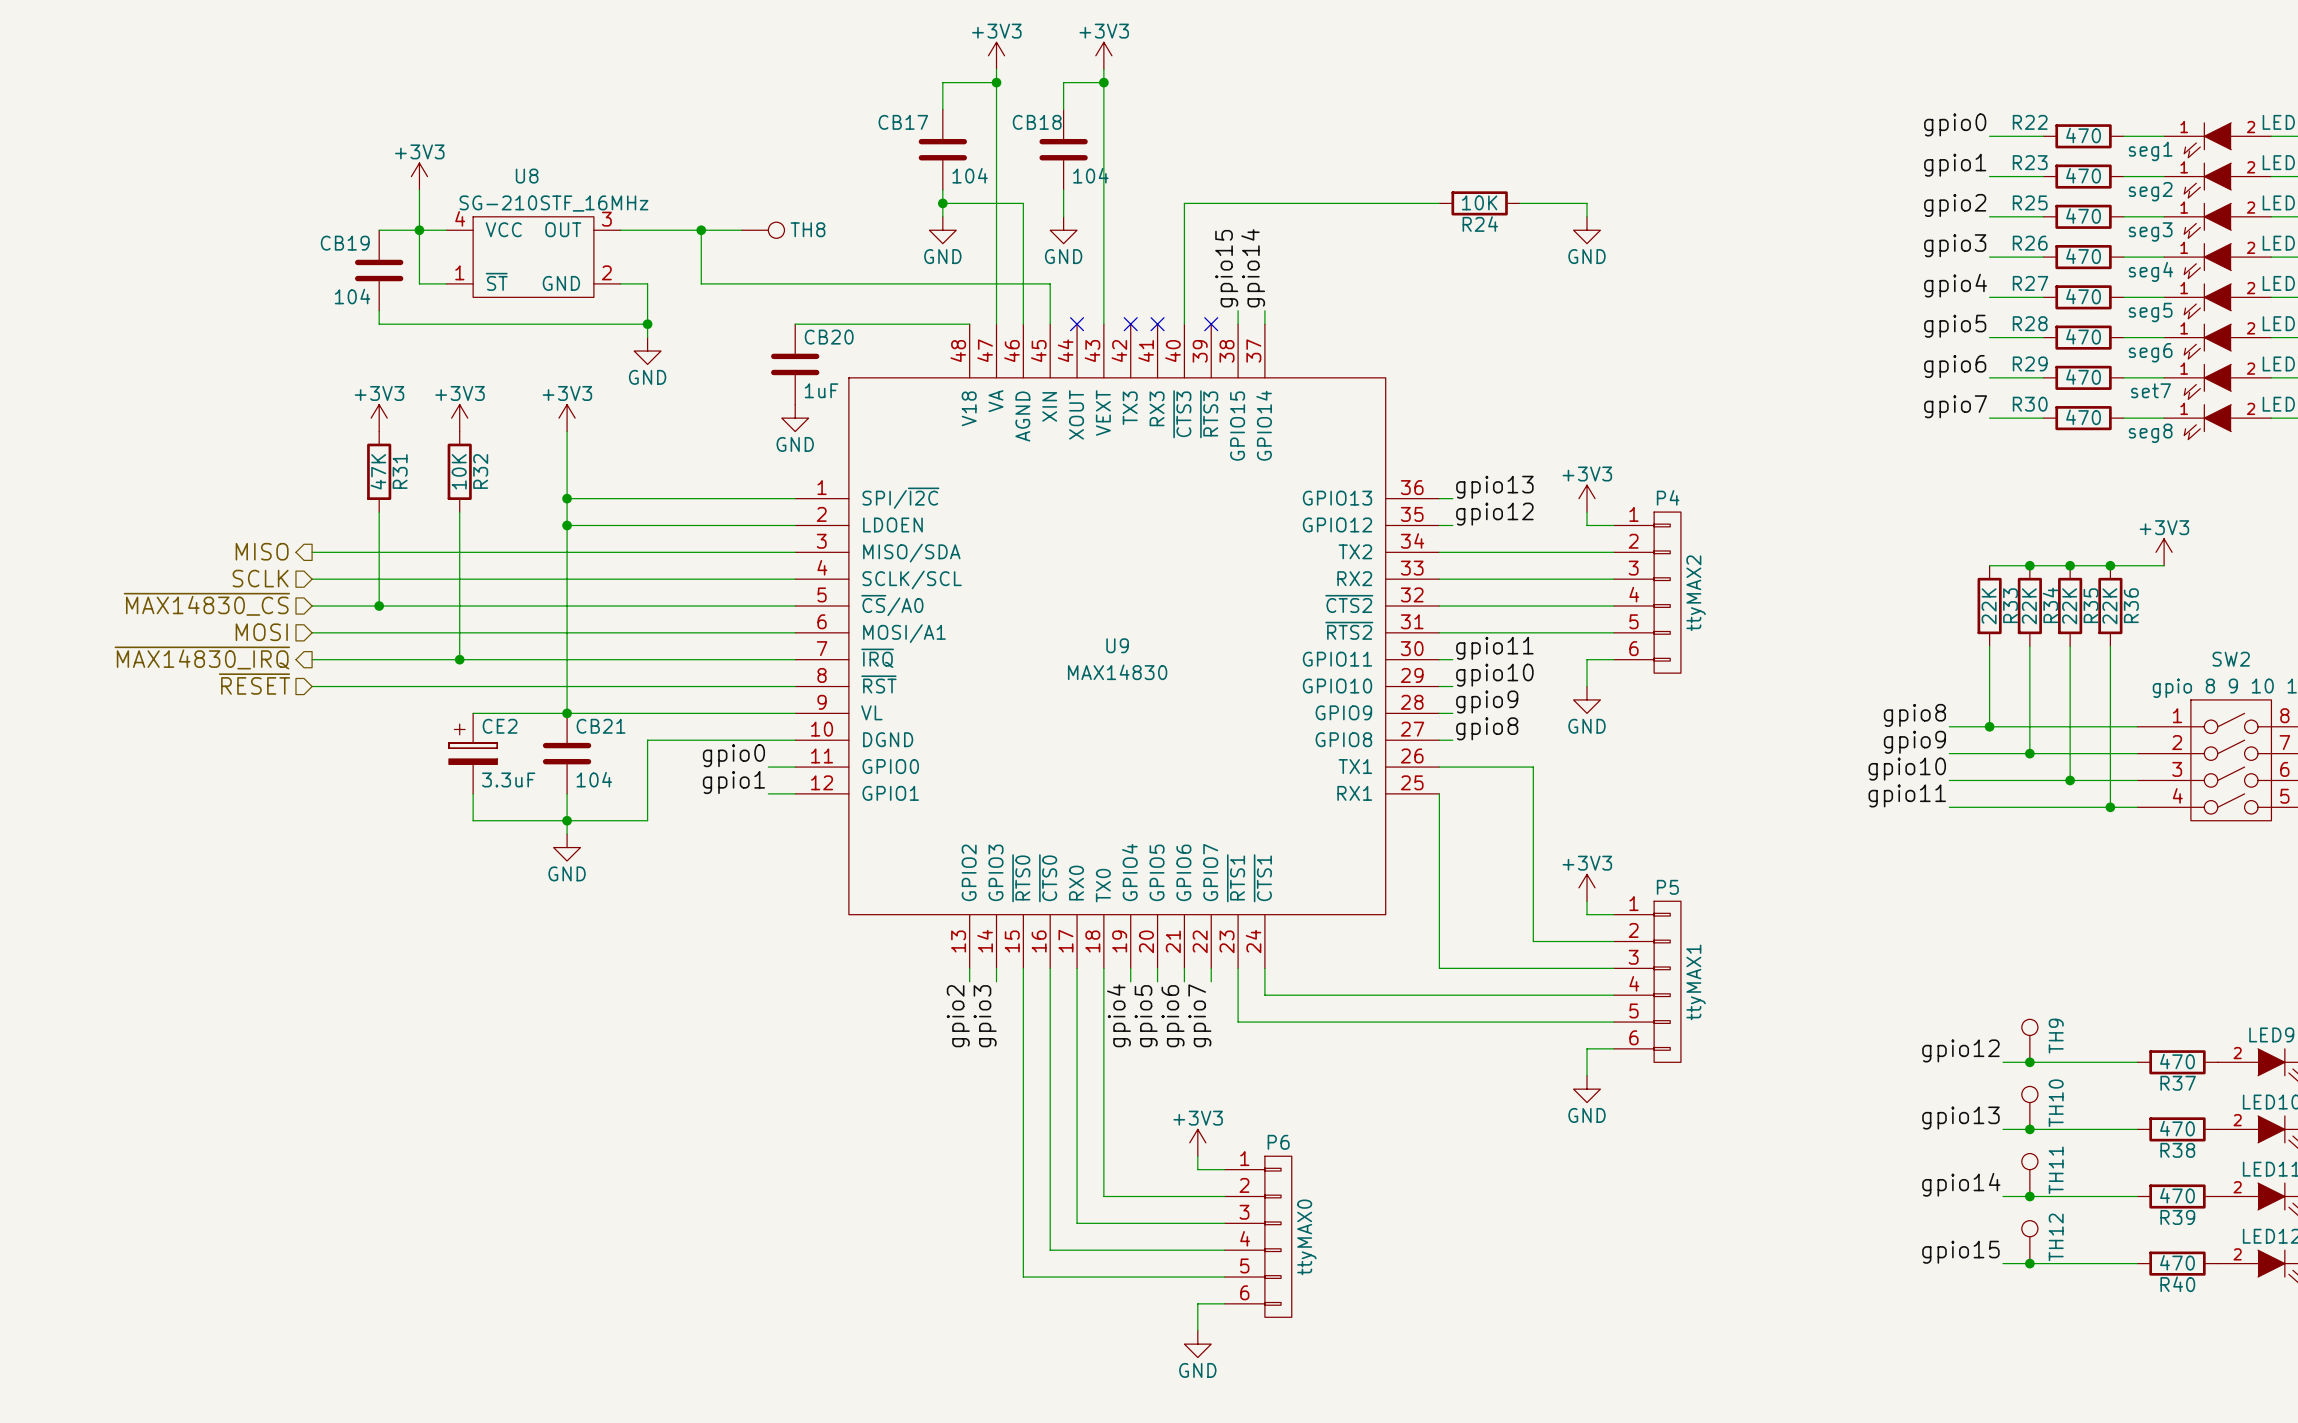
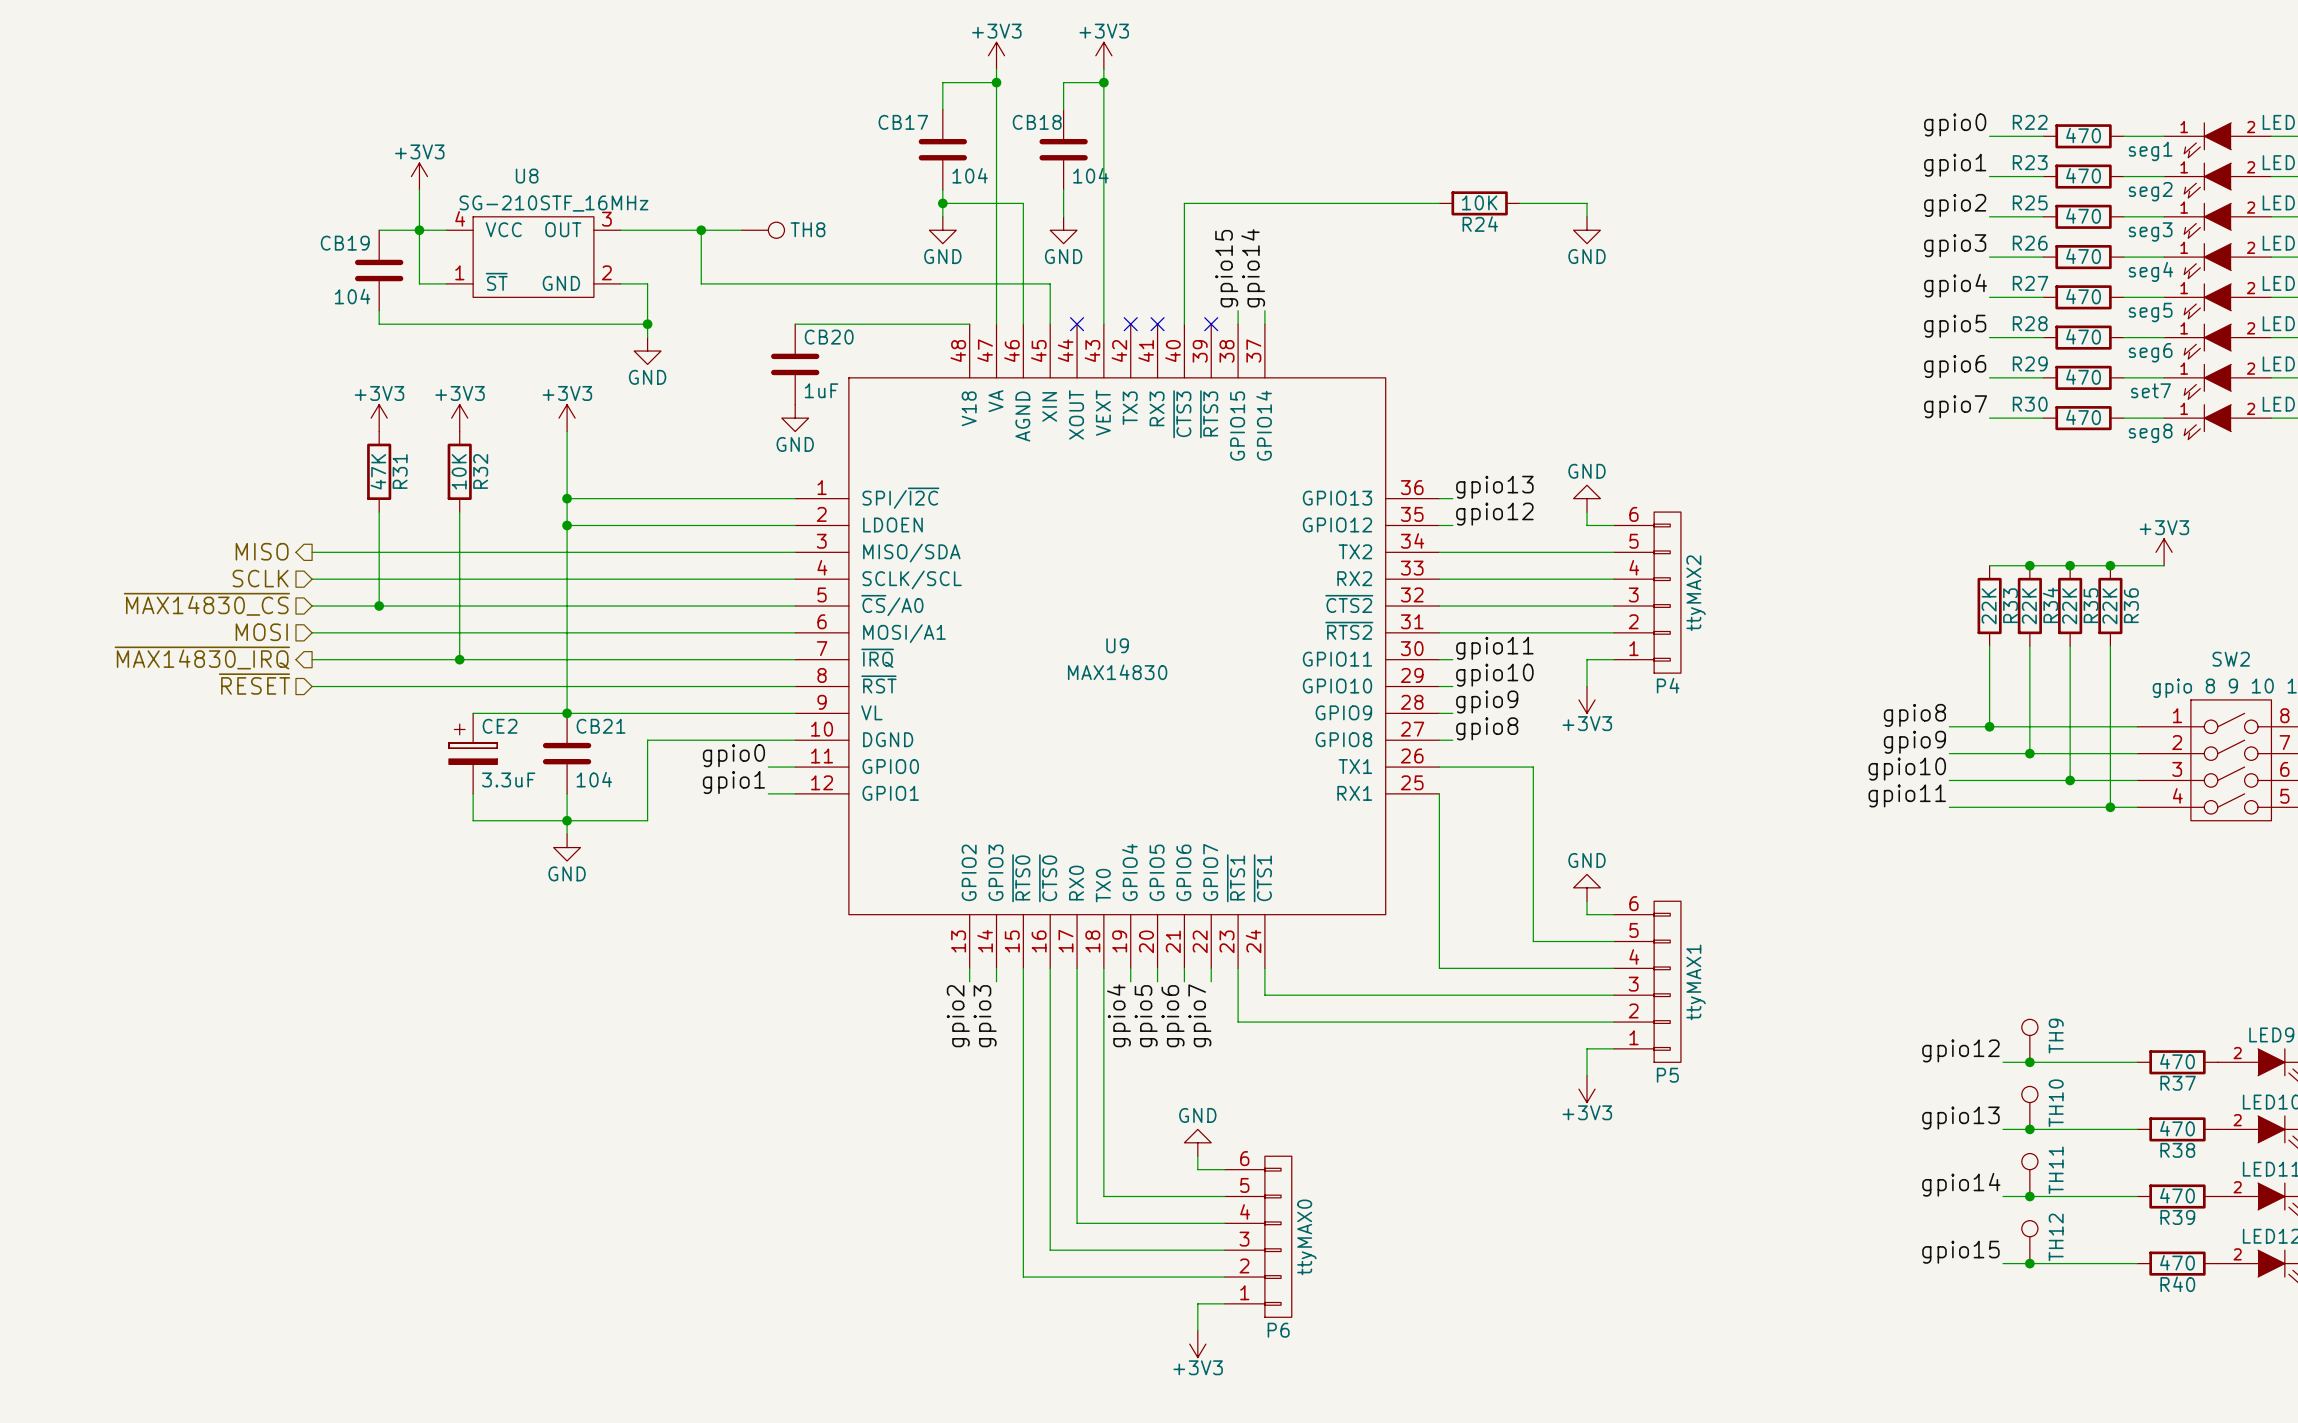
power symbol: +3V3 (1587, 498) -> GND (1587, 498)
P4 flip: as is (1667, 592) -> up-down (1667, 592)
power symbol: GND (1587, 699) -> +3V3 (1587, 699)
power symbol: +3V3 (1587, 887) -> GND (1587, 887)
P5 flip: as is (1667, 981) -> up-down (1667, 981)
power symbol: GND (1587, 1089) -> +3V3 (1587, 1089)
power symbol: +3V3 (1197, 1142) -> GND (1197, 1142)
P6 flip: as is (1278, 1236) -> up-down (1278, 1236)
power symbol: GND (1197, 1344) -> +3V3 (1197, 1344)

